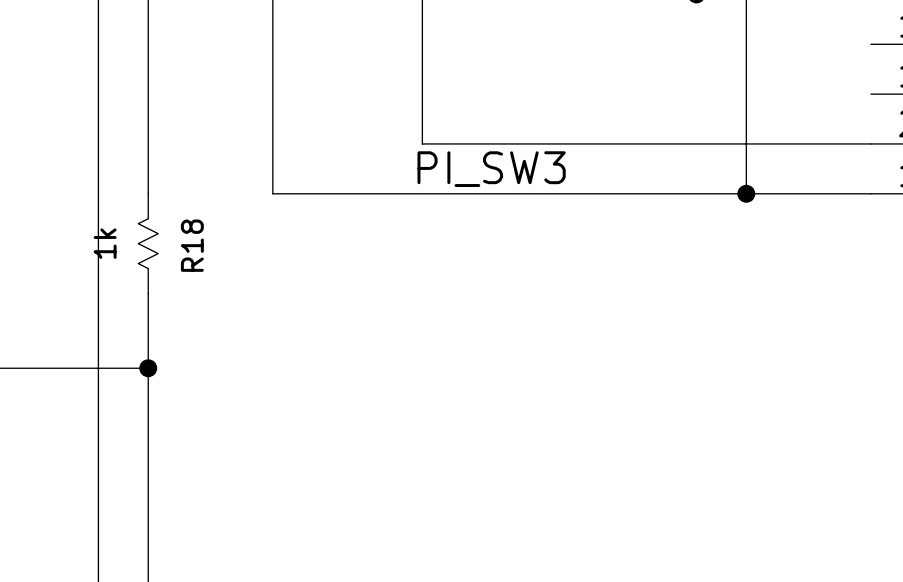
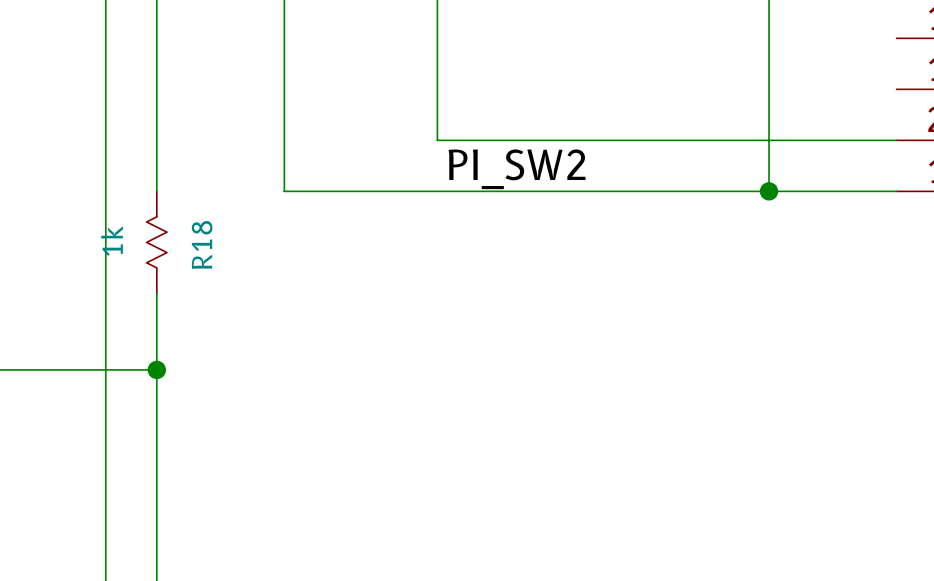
label: PI_SW3 (491, 169) -> PI_SW2 (517, 169)

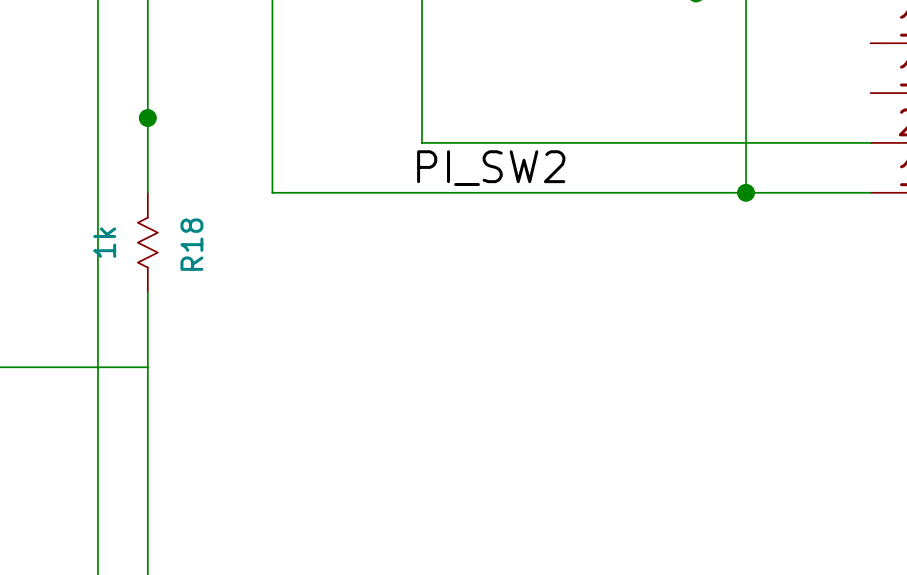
junction: none -> (147, 118)
junction: (156, 369) -> none

